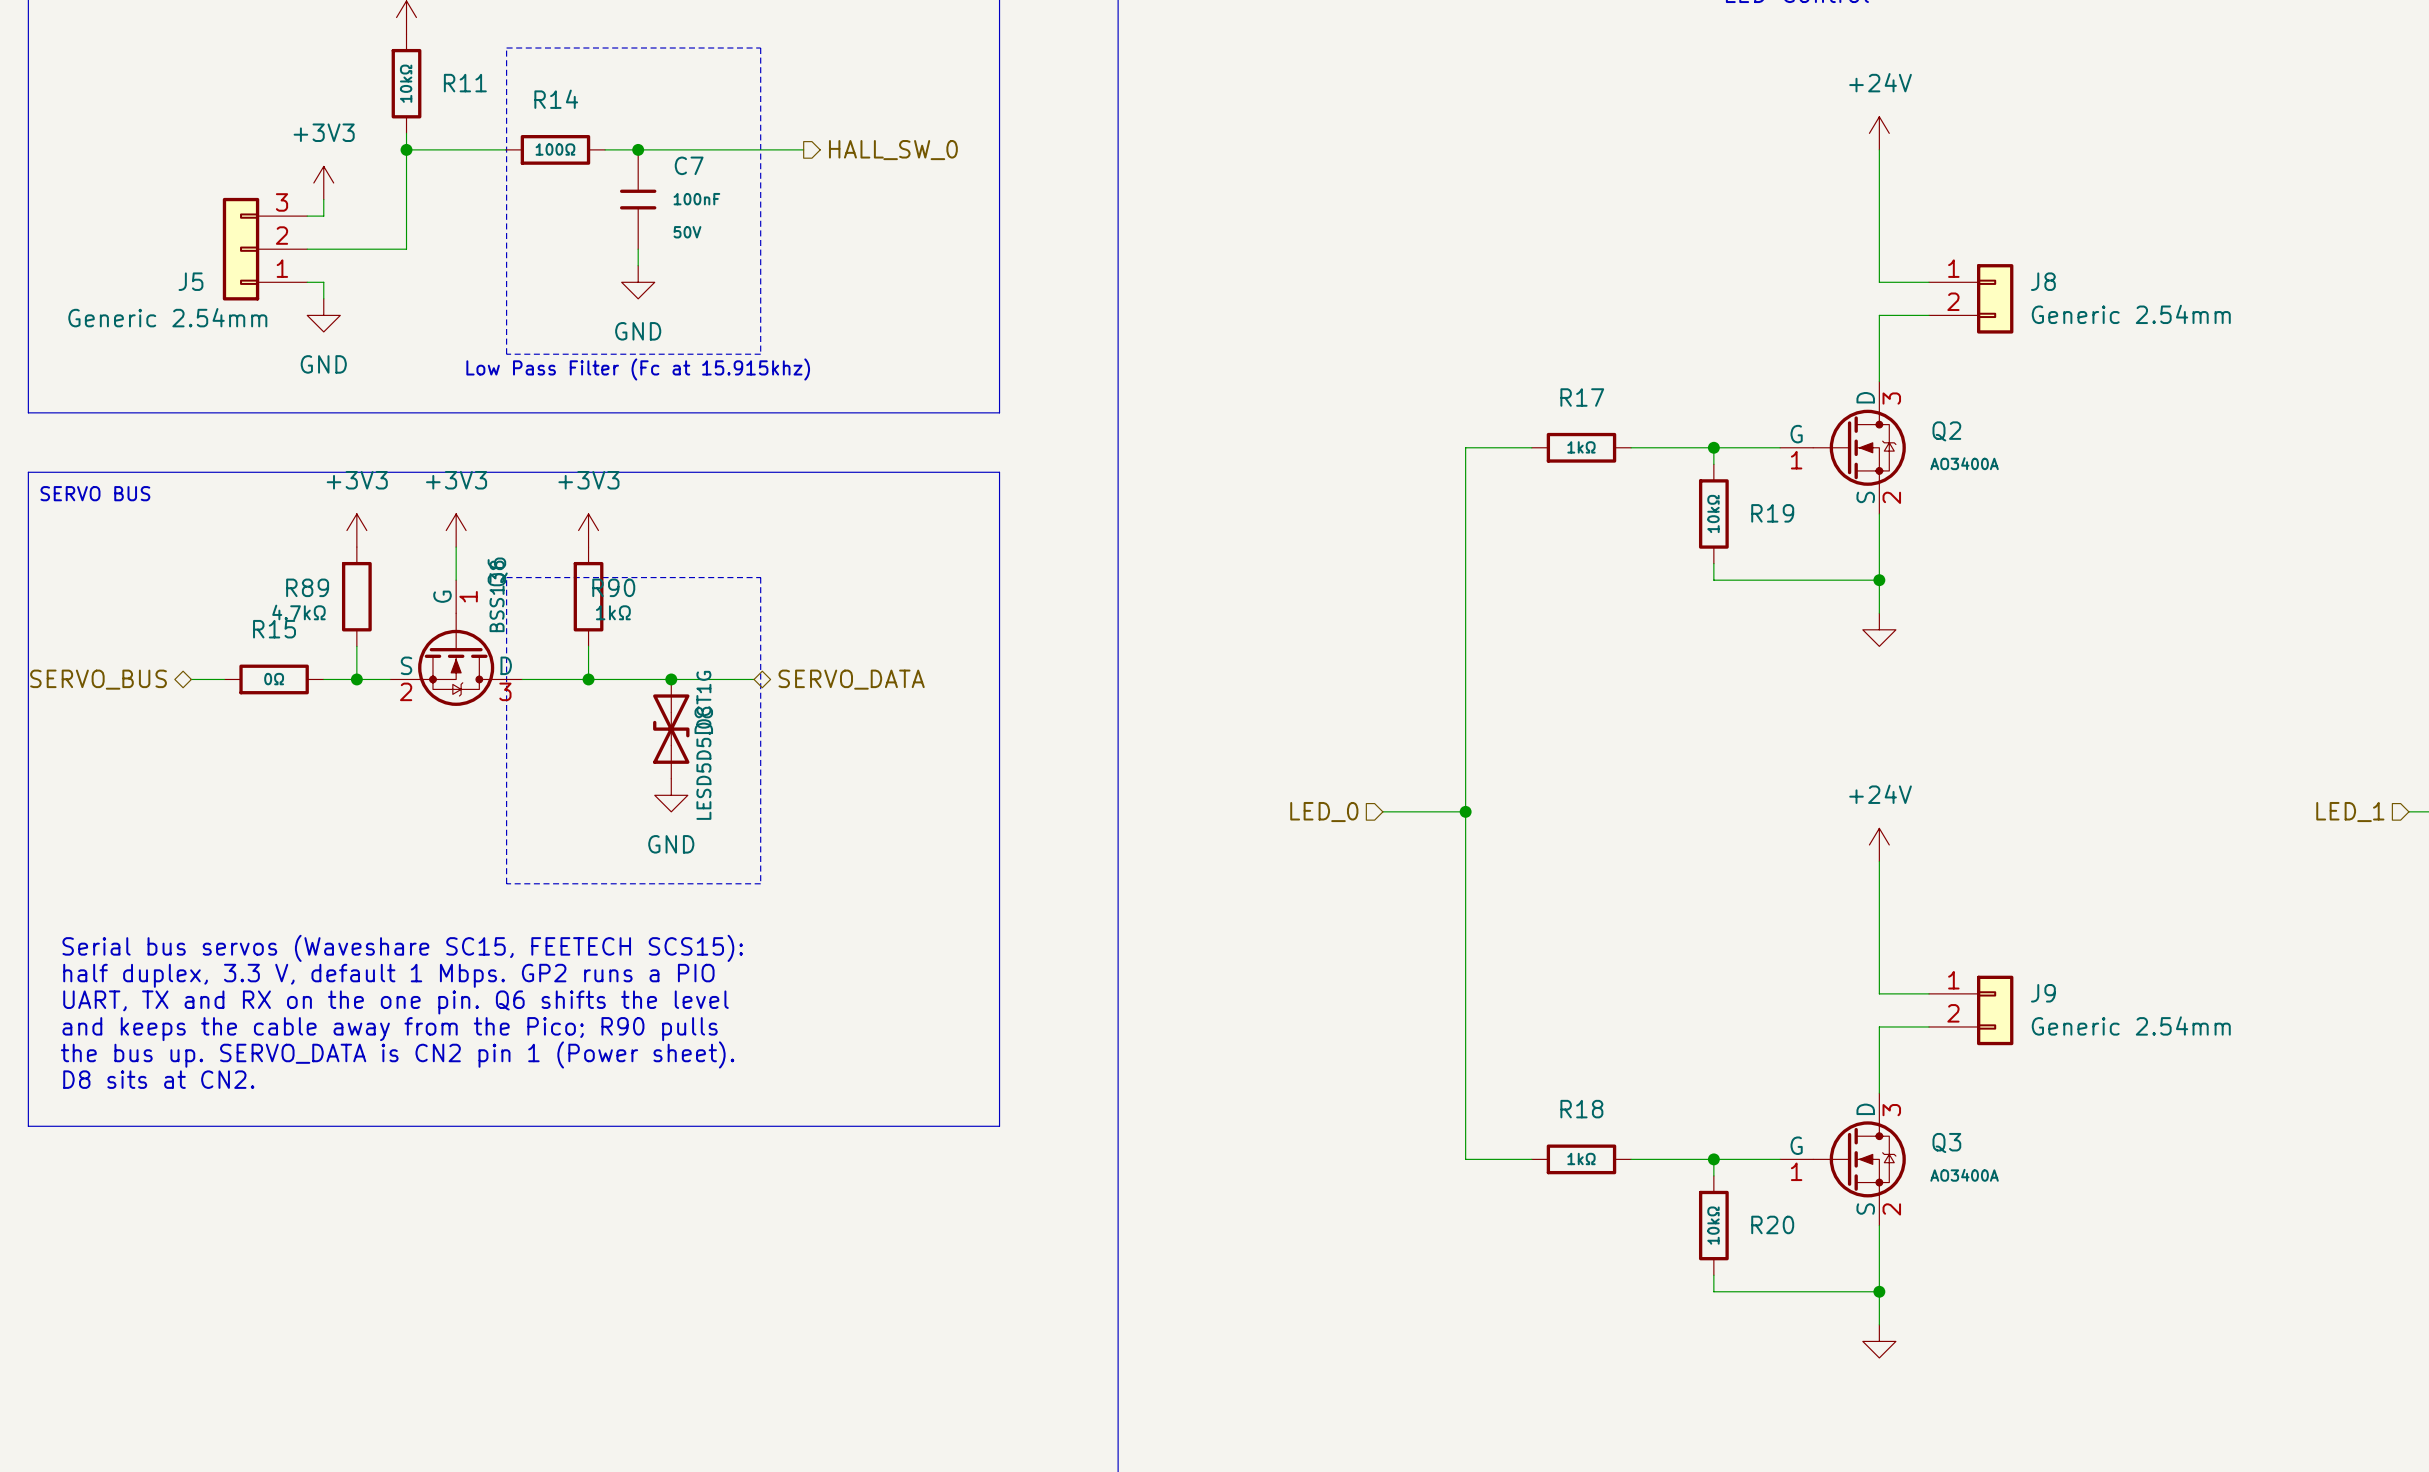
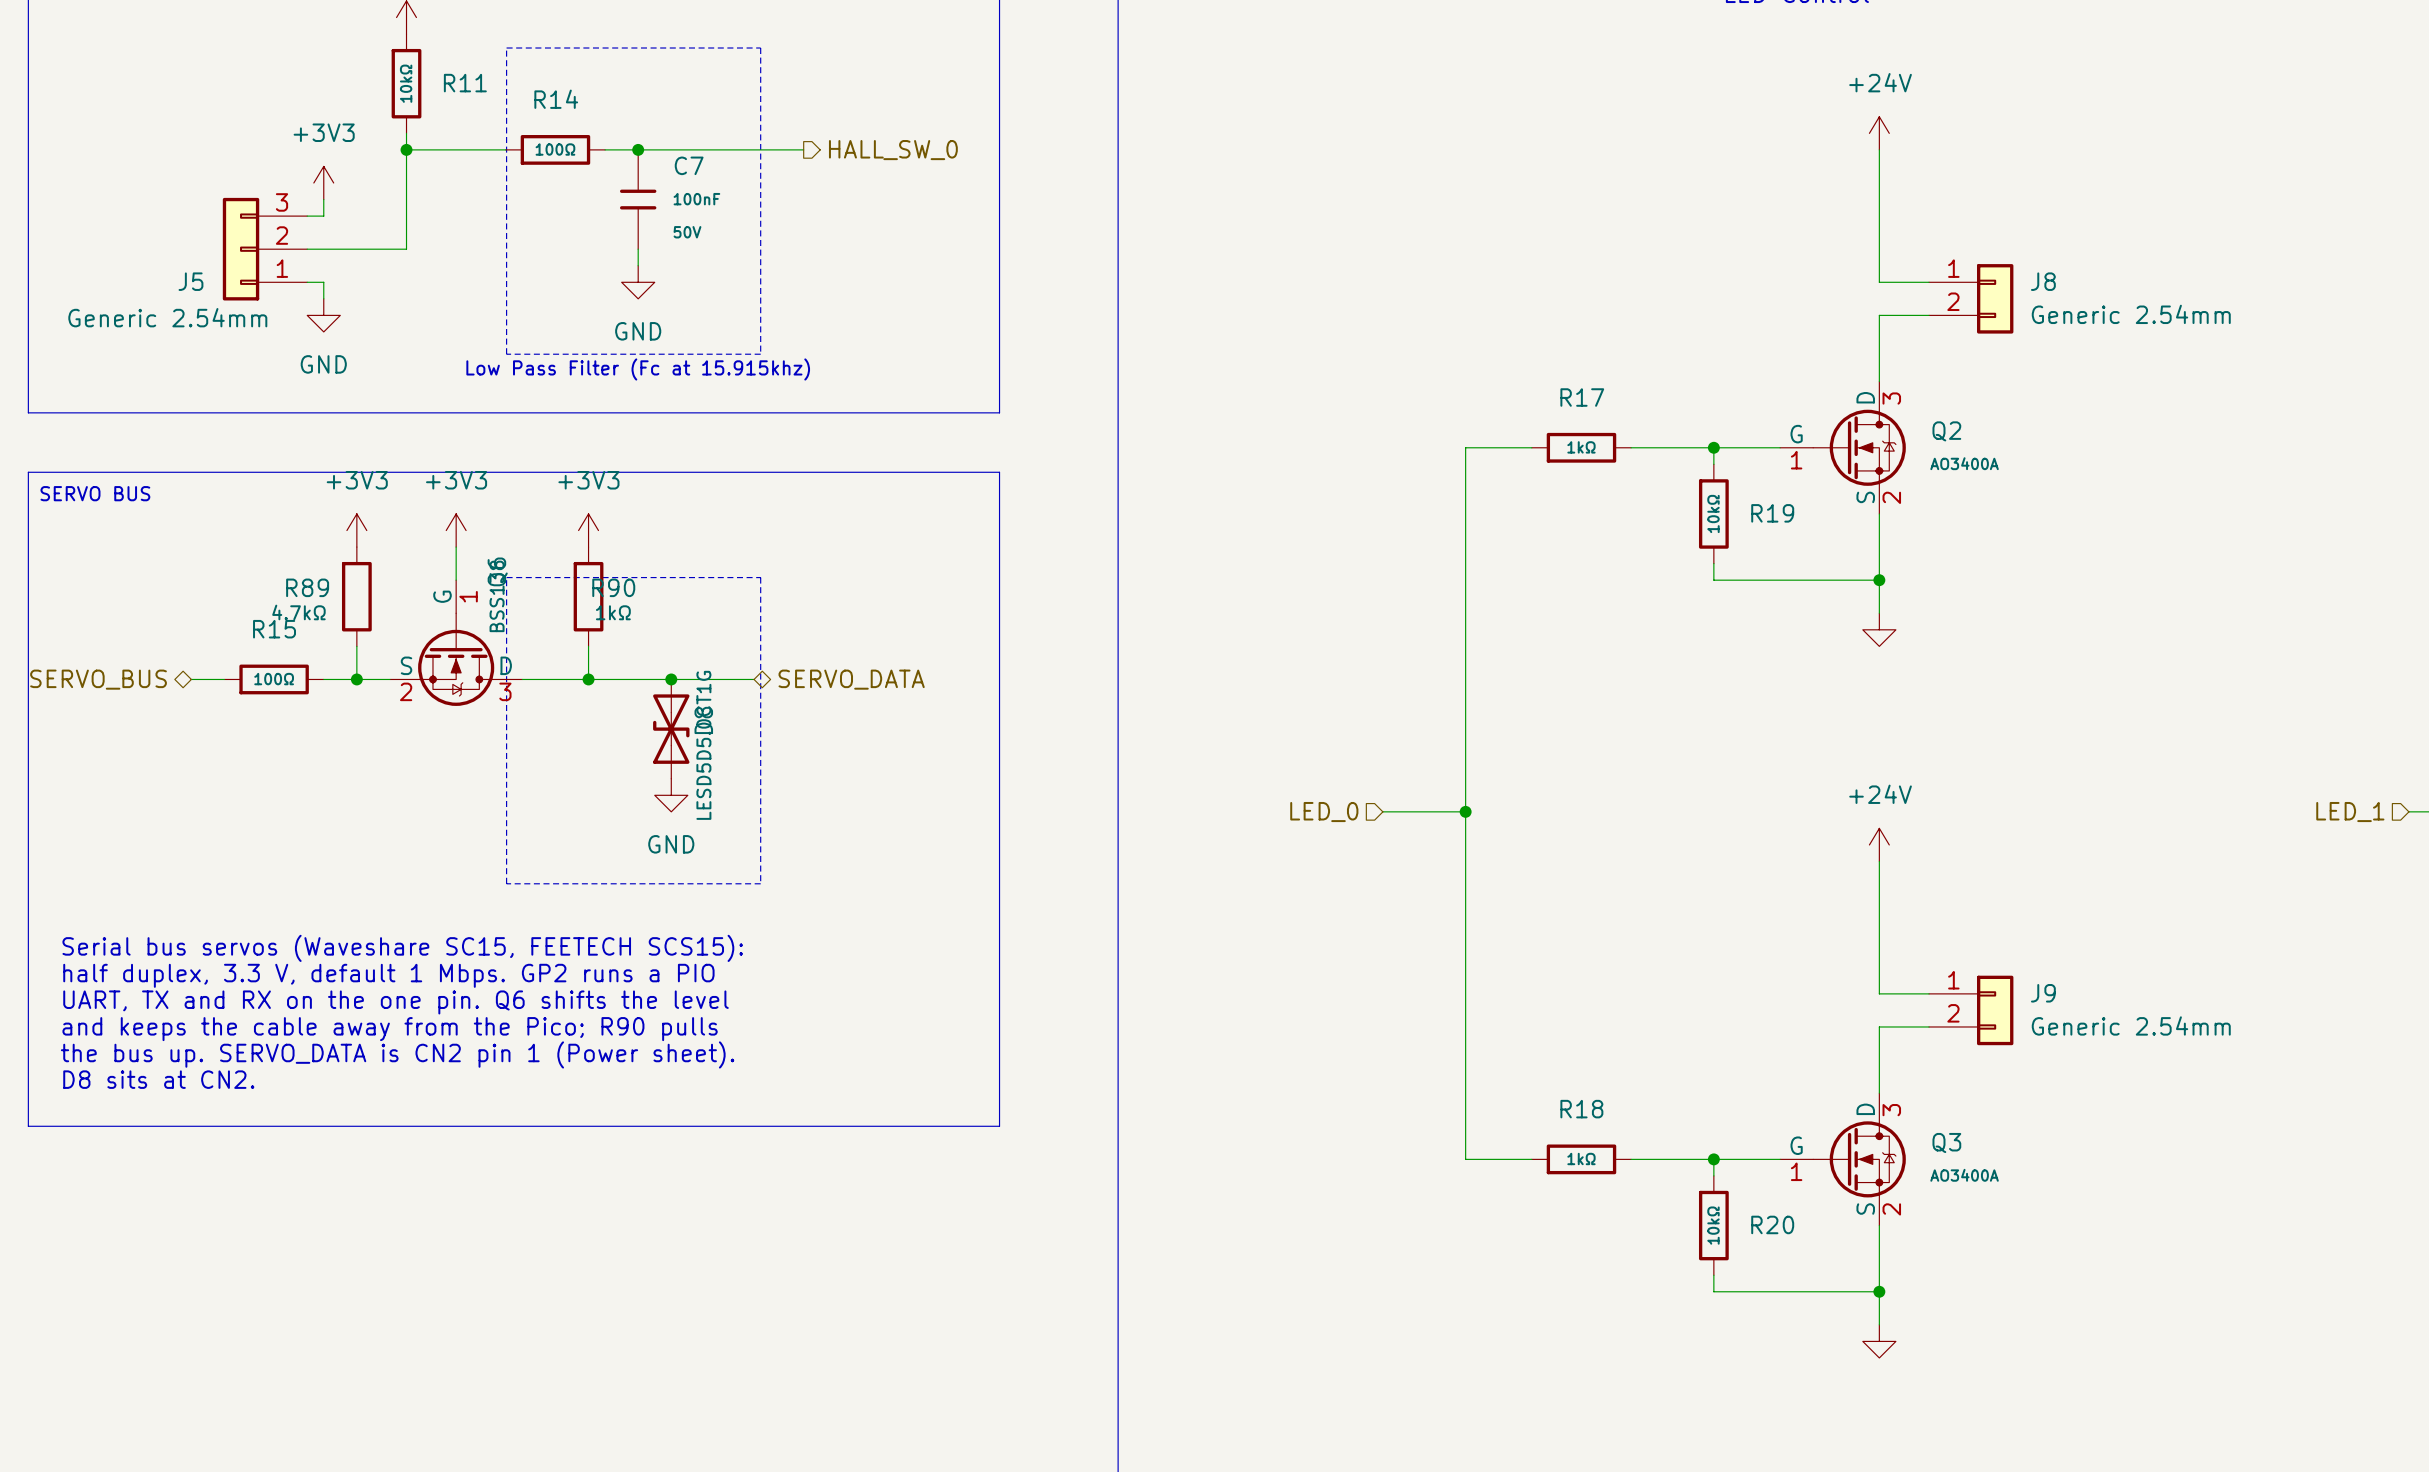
R15 value: 0Ω (274, 679) -> 100Ω (274, 679)

